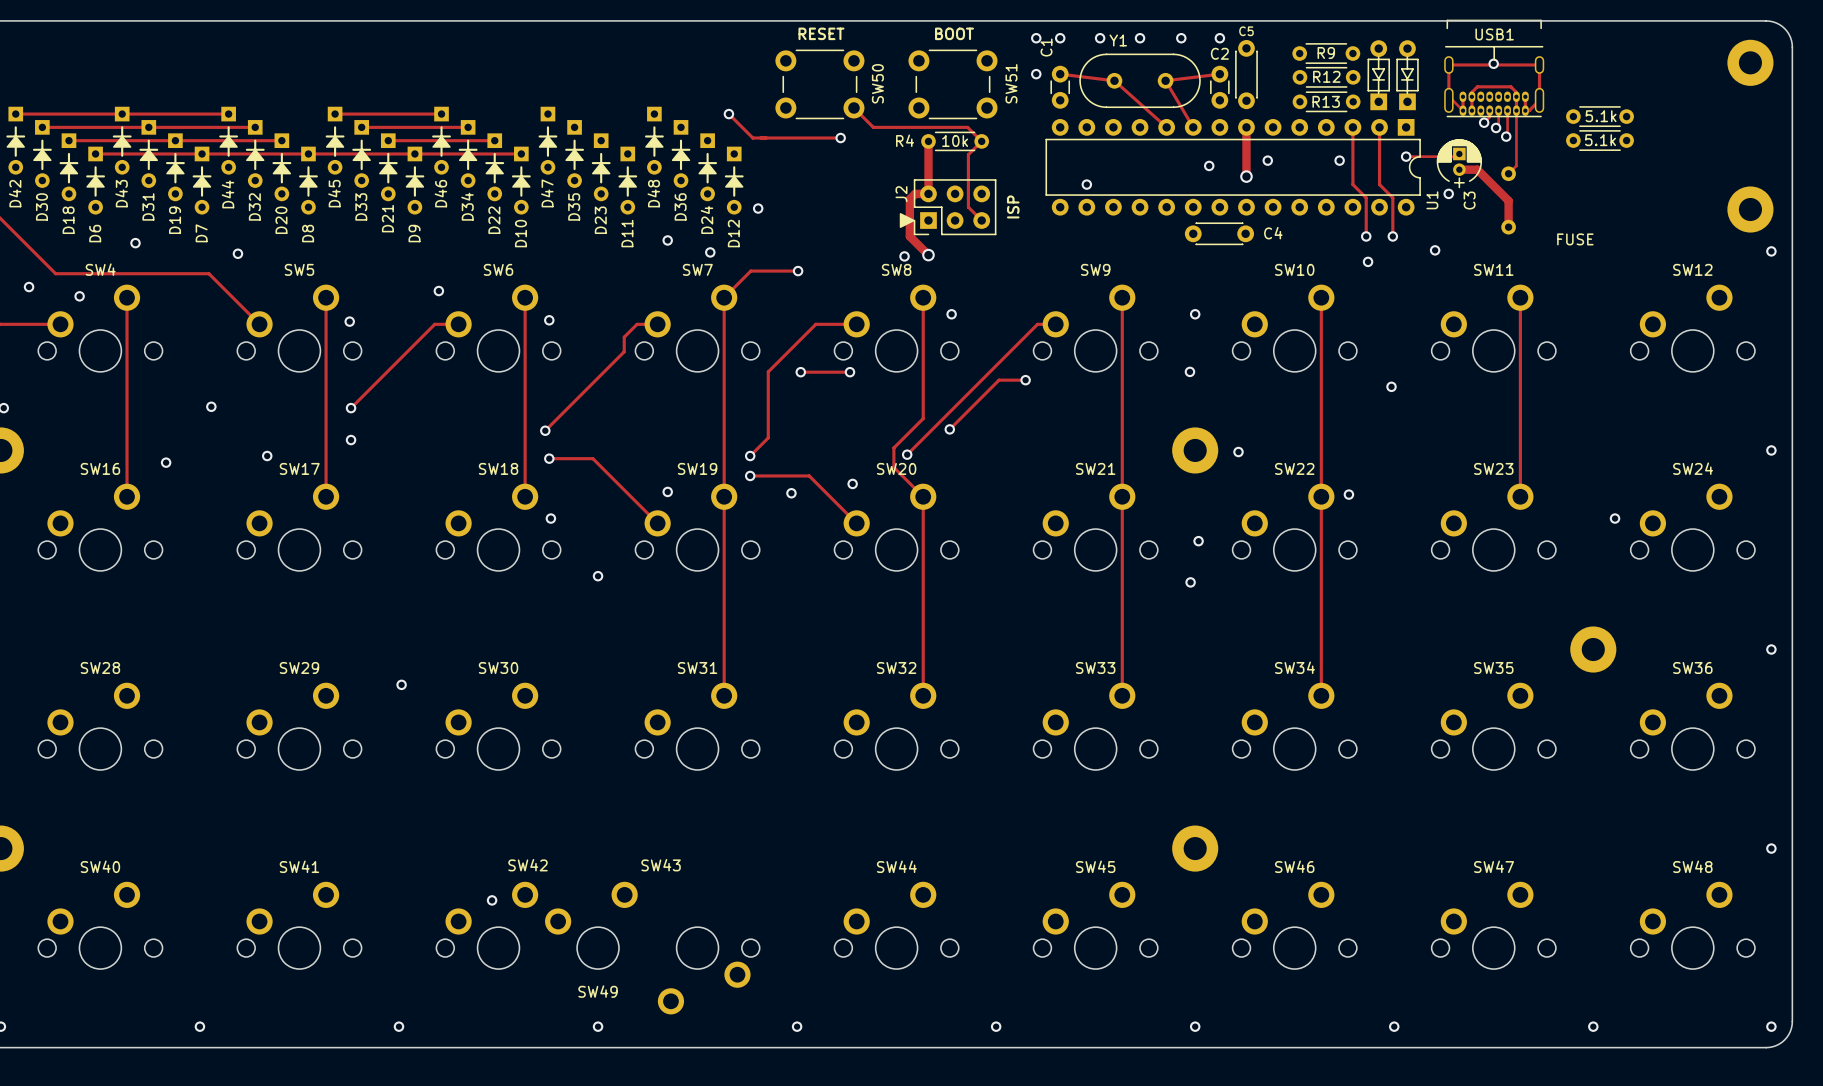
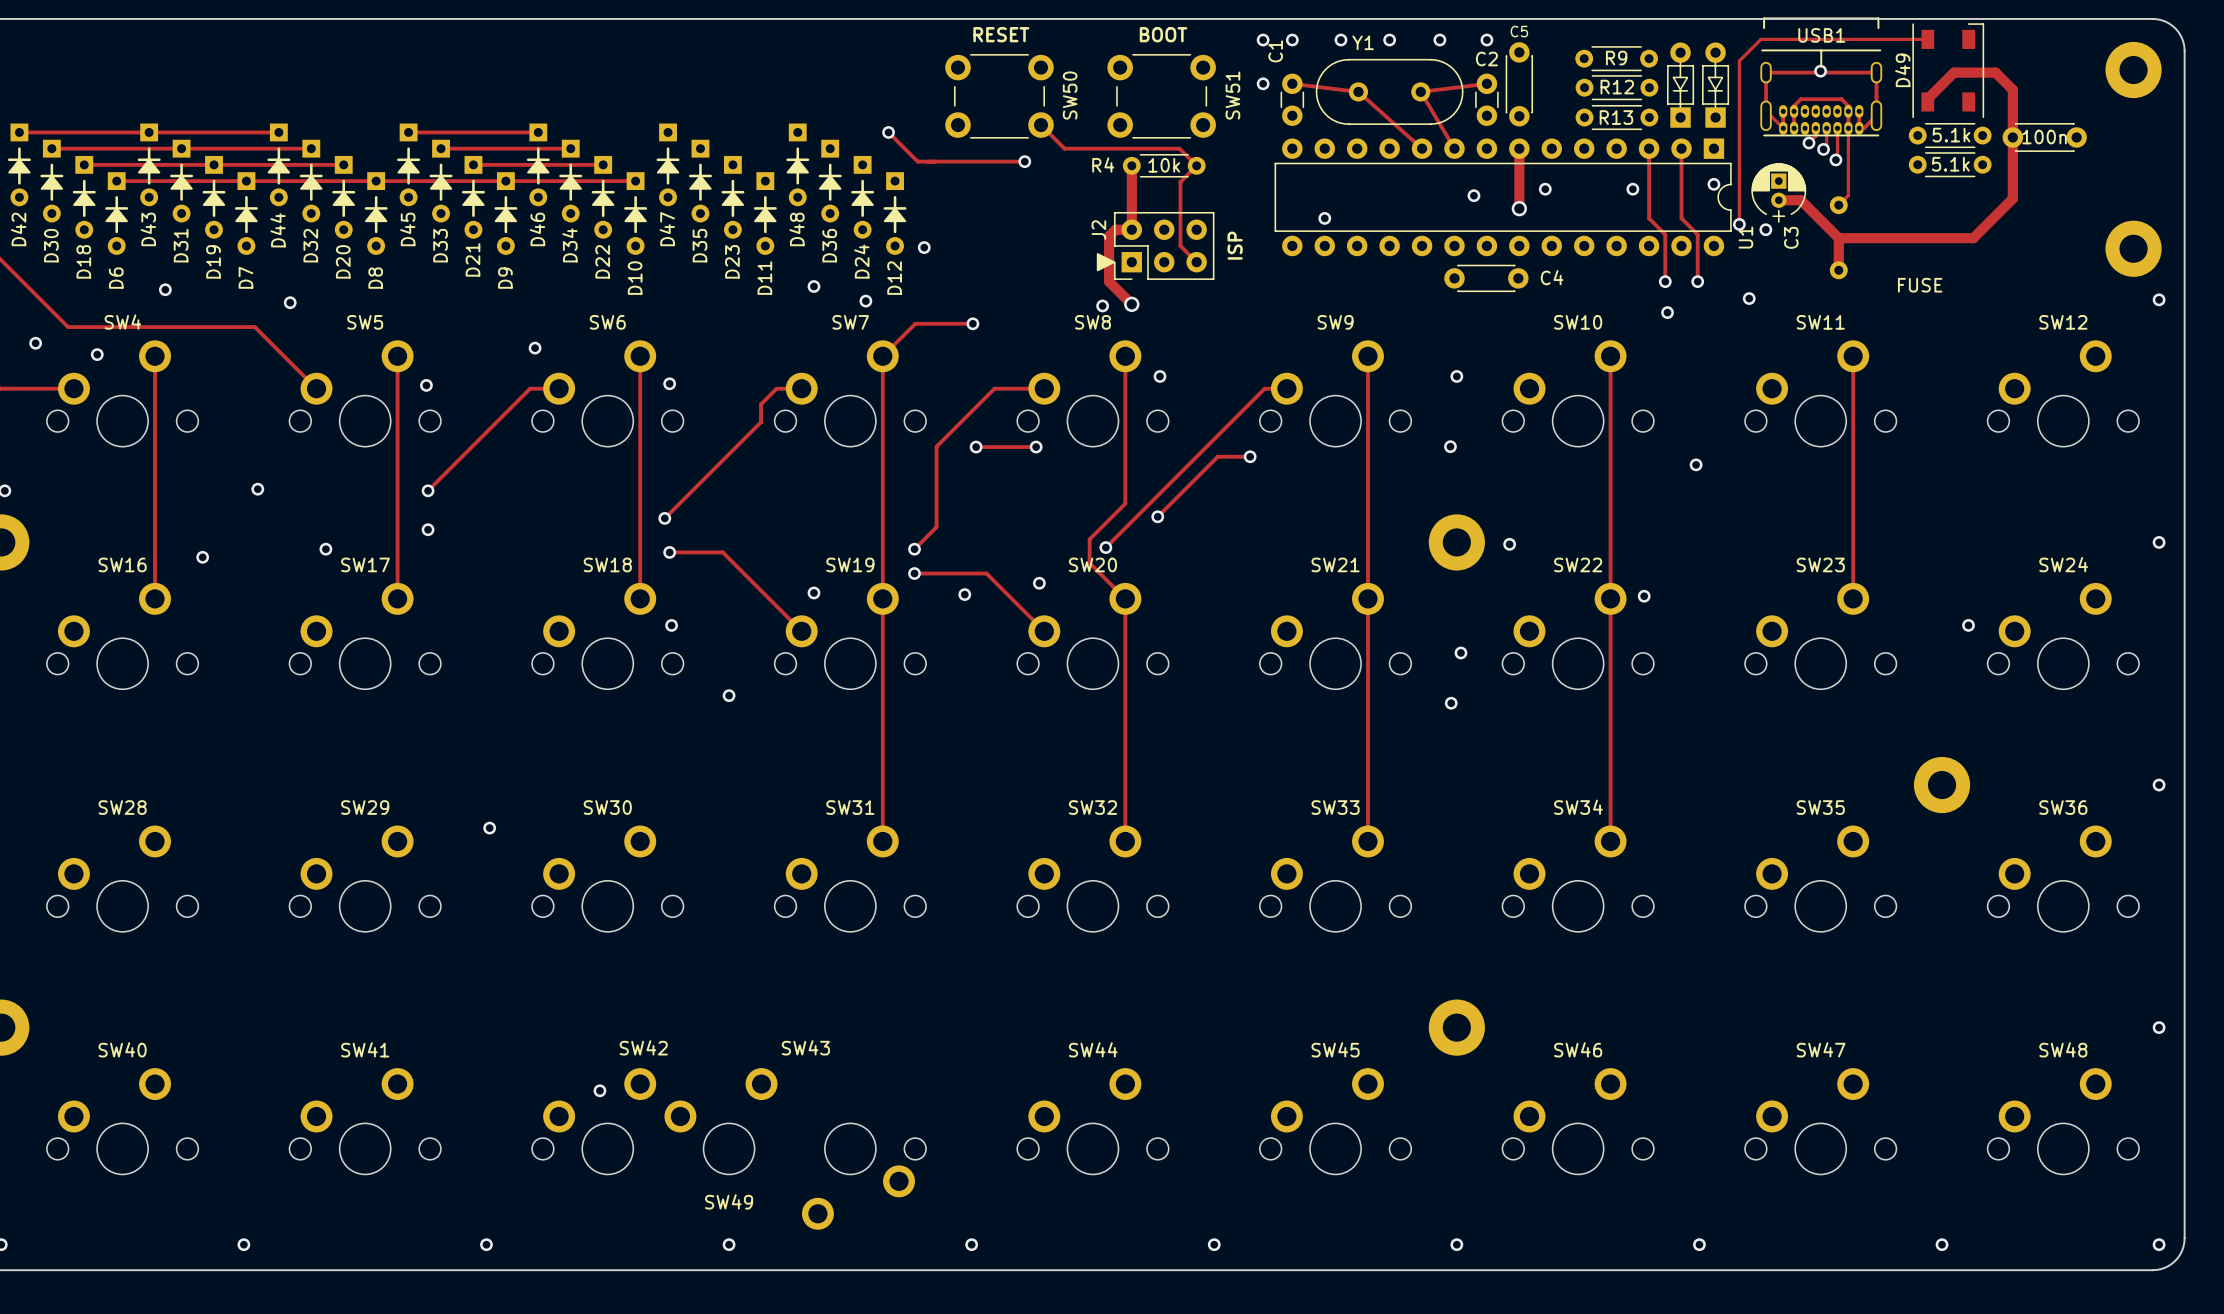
track: none -> (1927, 39) (1760, 39) (1739, 60) (1739, 224)
D49: none -> (1948, 70)
track: none -> (1927, 105) (1927, 98) (1953, 72) (1995, 72) (2012, 89) (2012, 198) (1973, 238) (1838, 238)
100n: none -> (2044, 137)
track: (1406, 156) (1456, 156) -> none
via: none -> (1739, 224)

